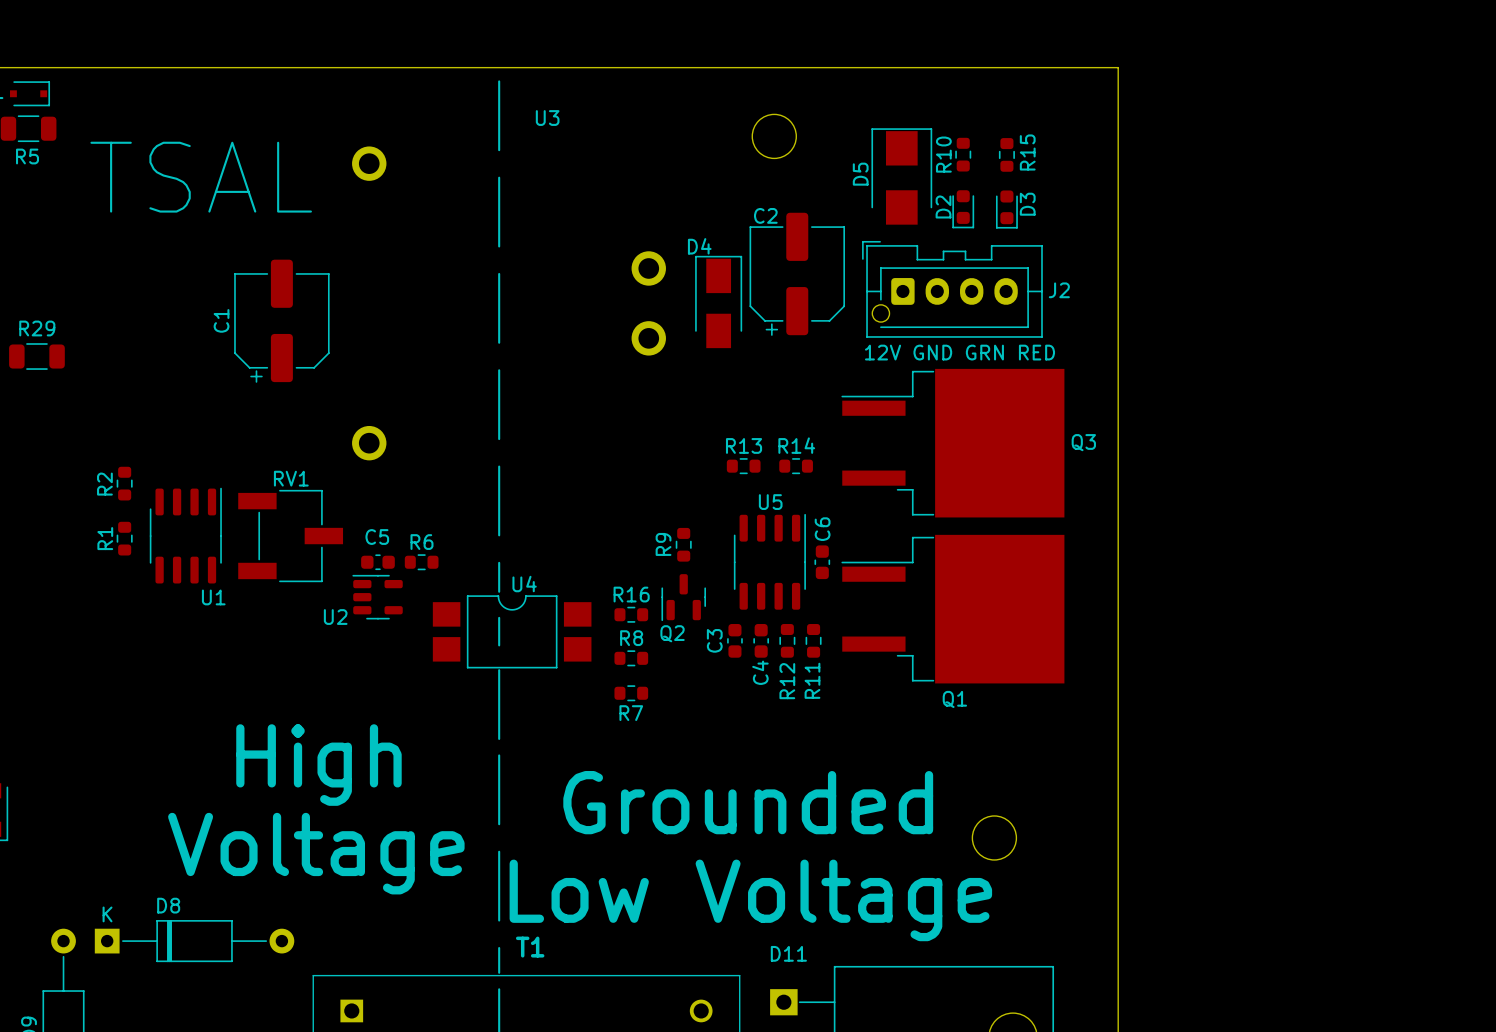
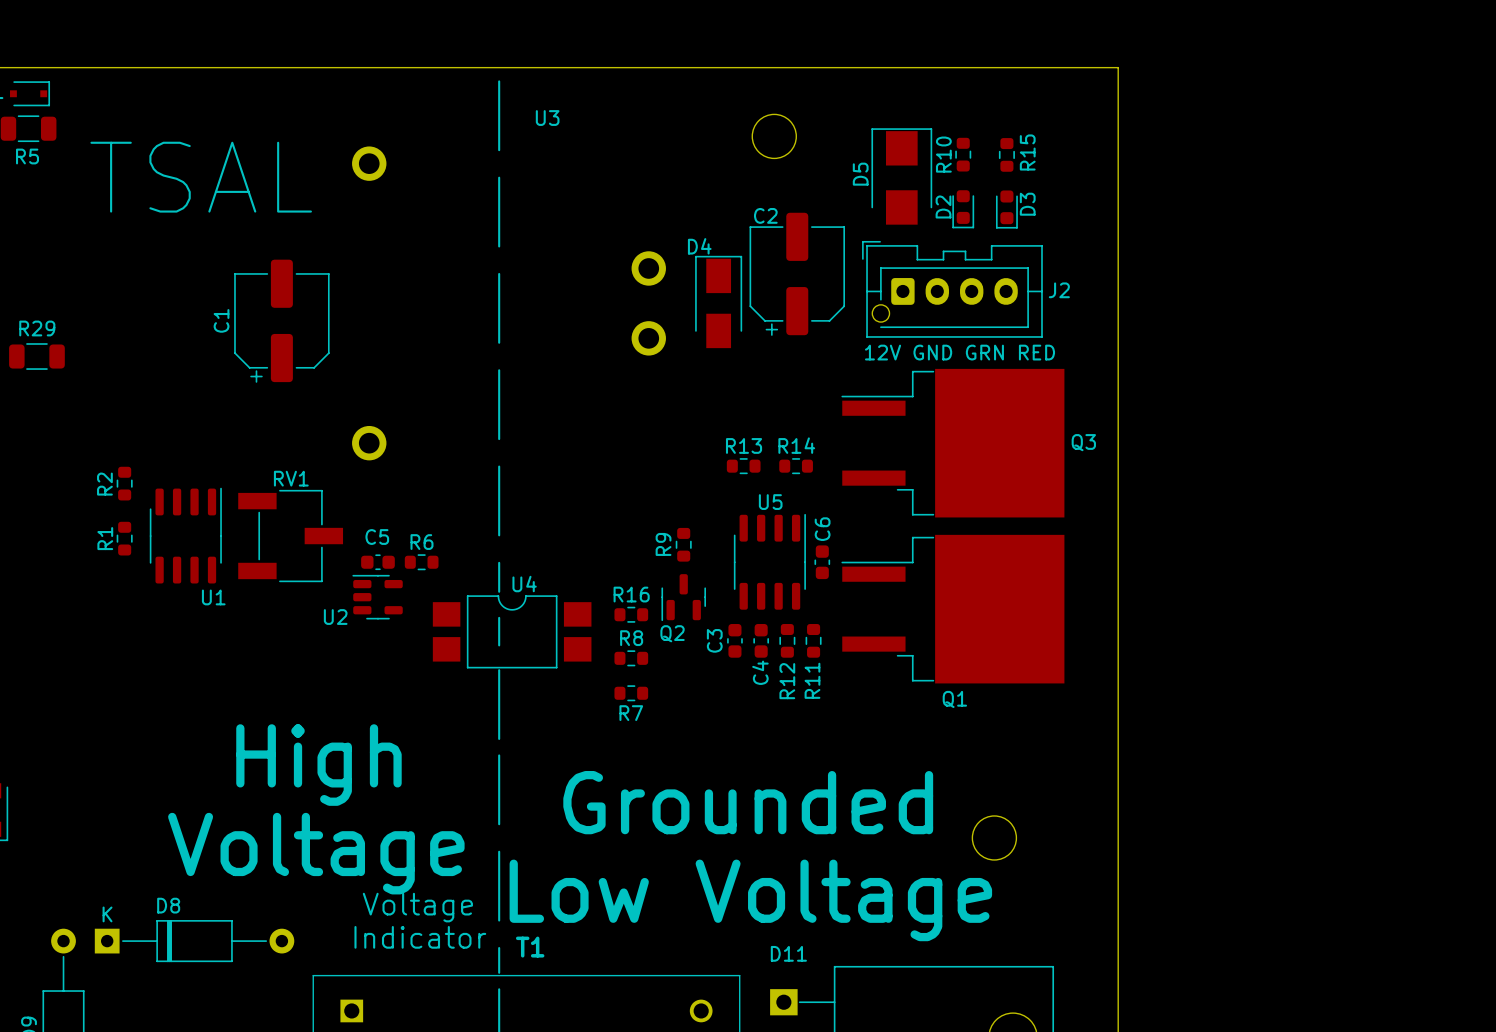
text: none -> Voltage (417, 907)
text: none -> Indicator (420, 937)

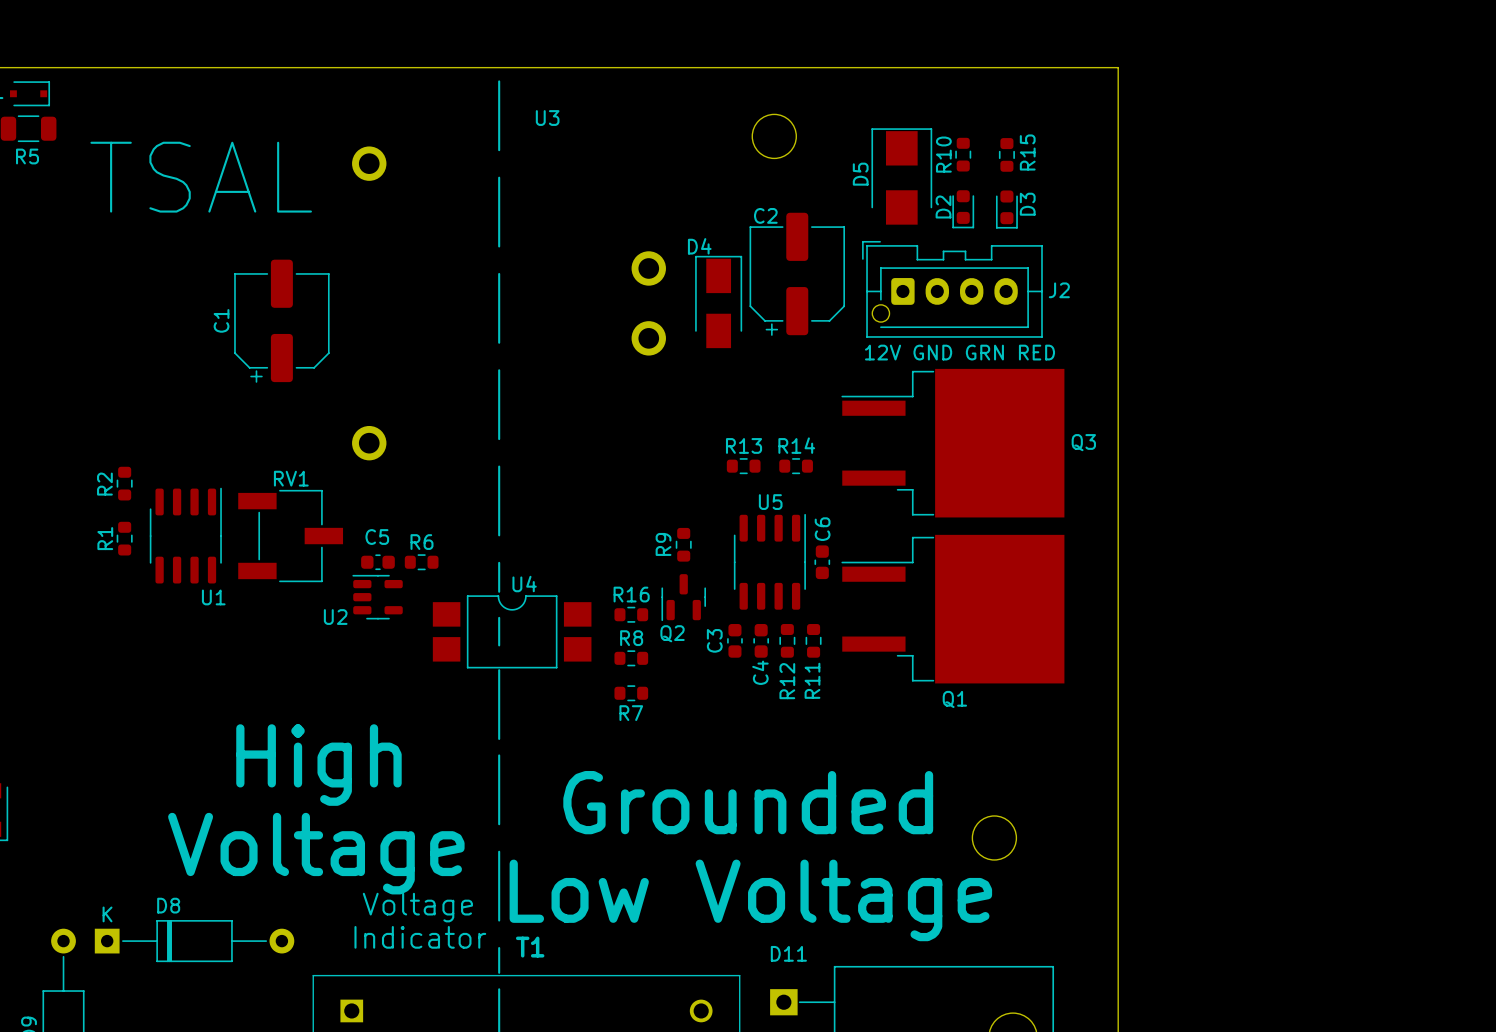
R29: (36, 356) -> none

